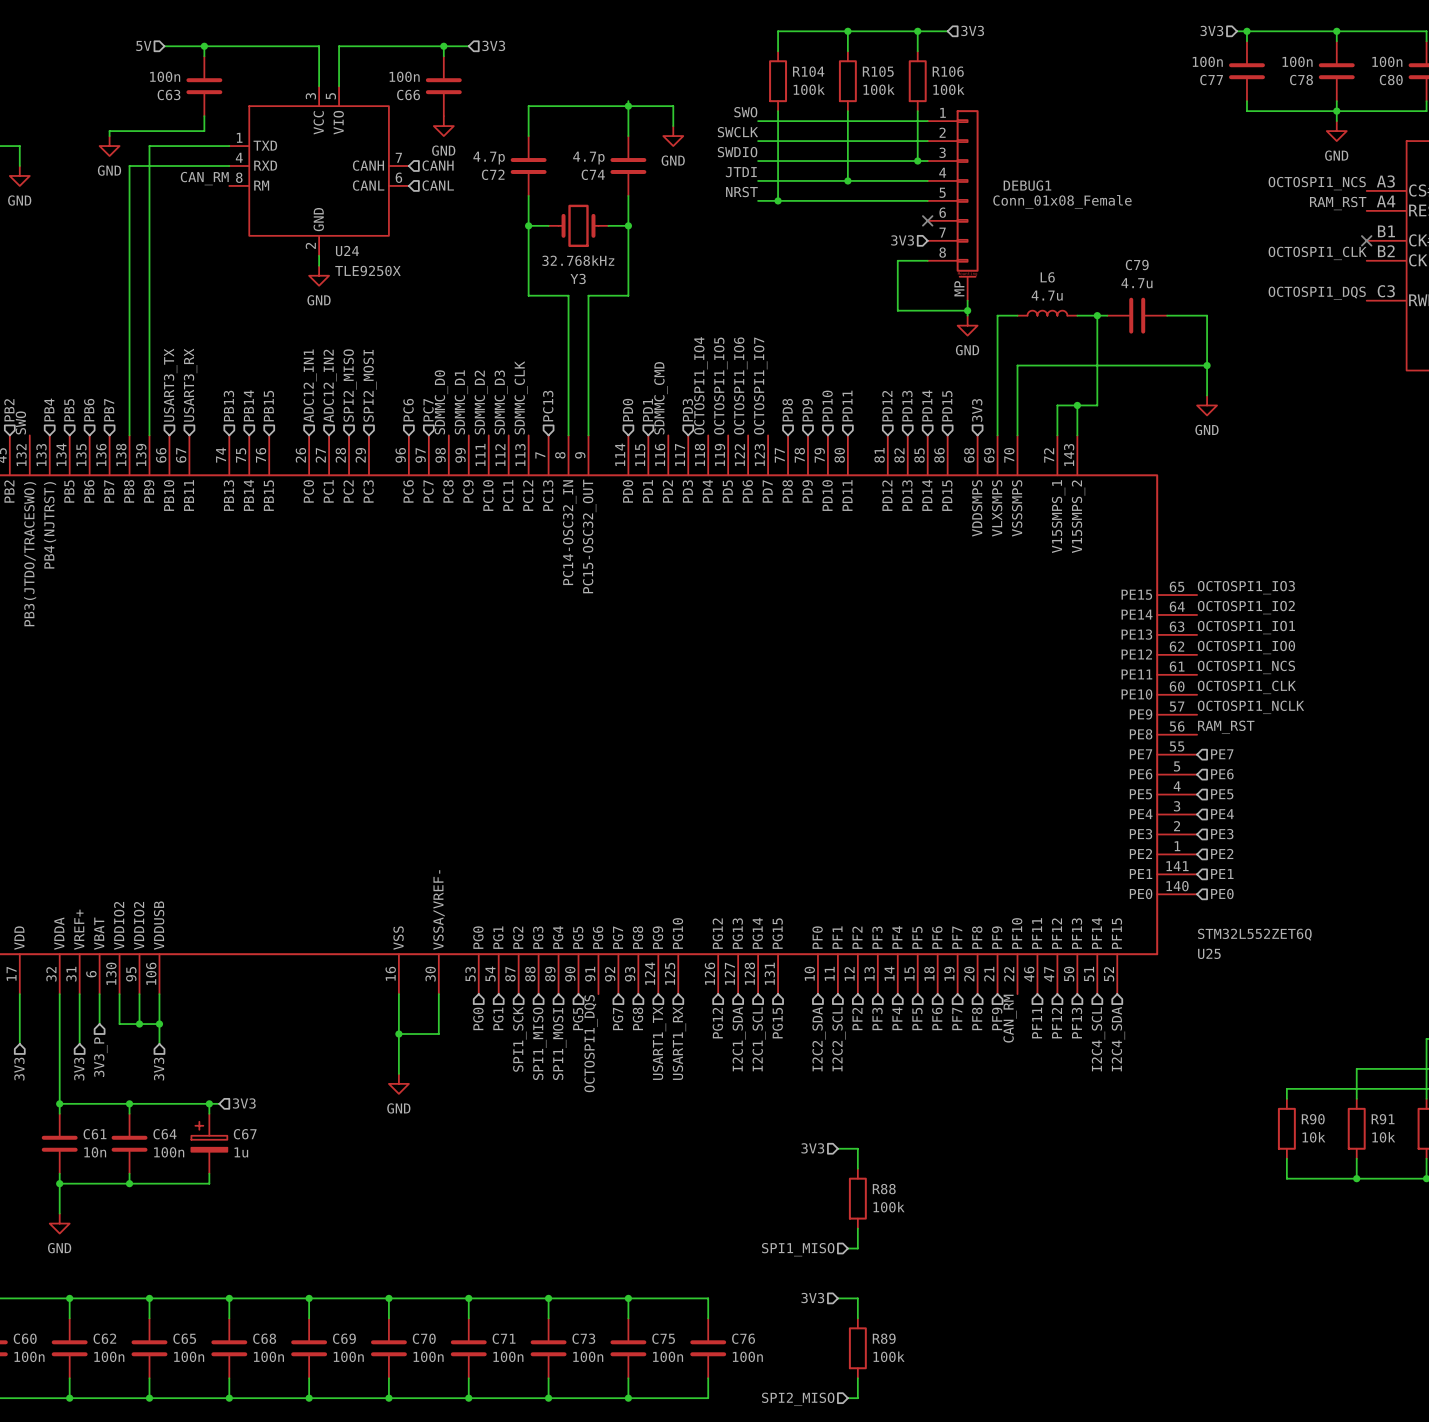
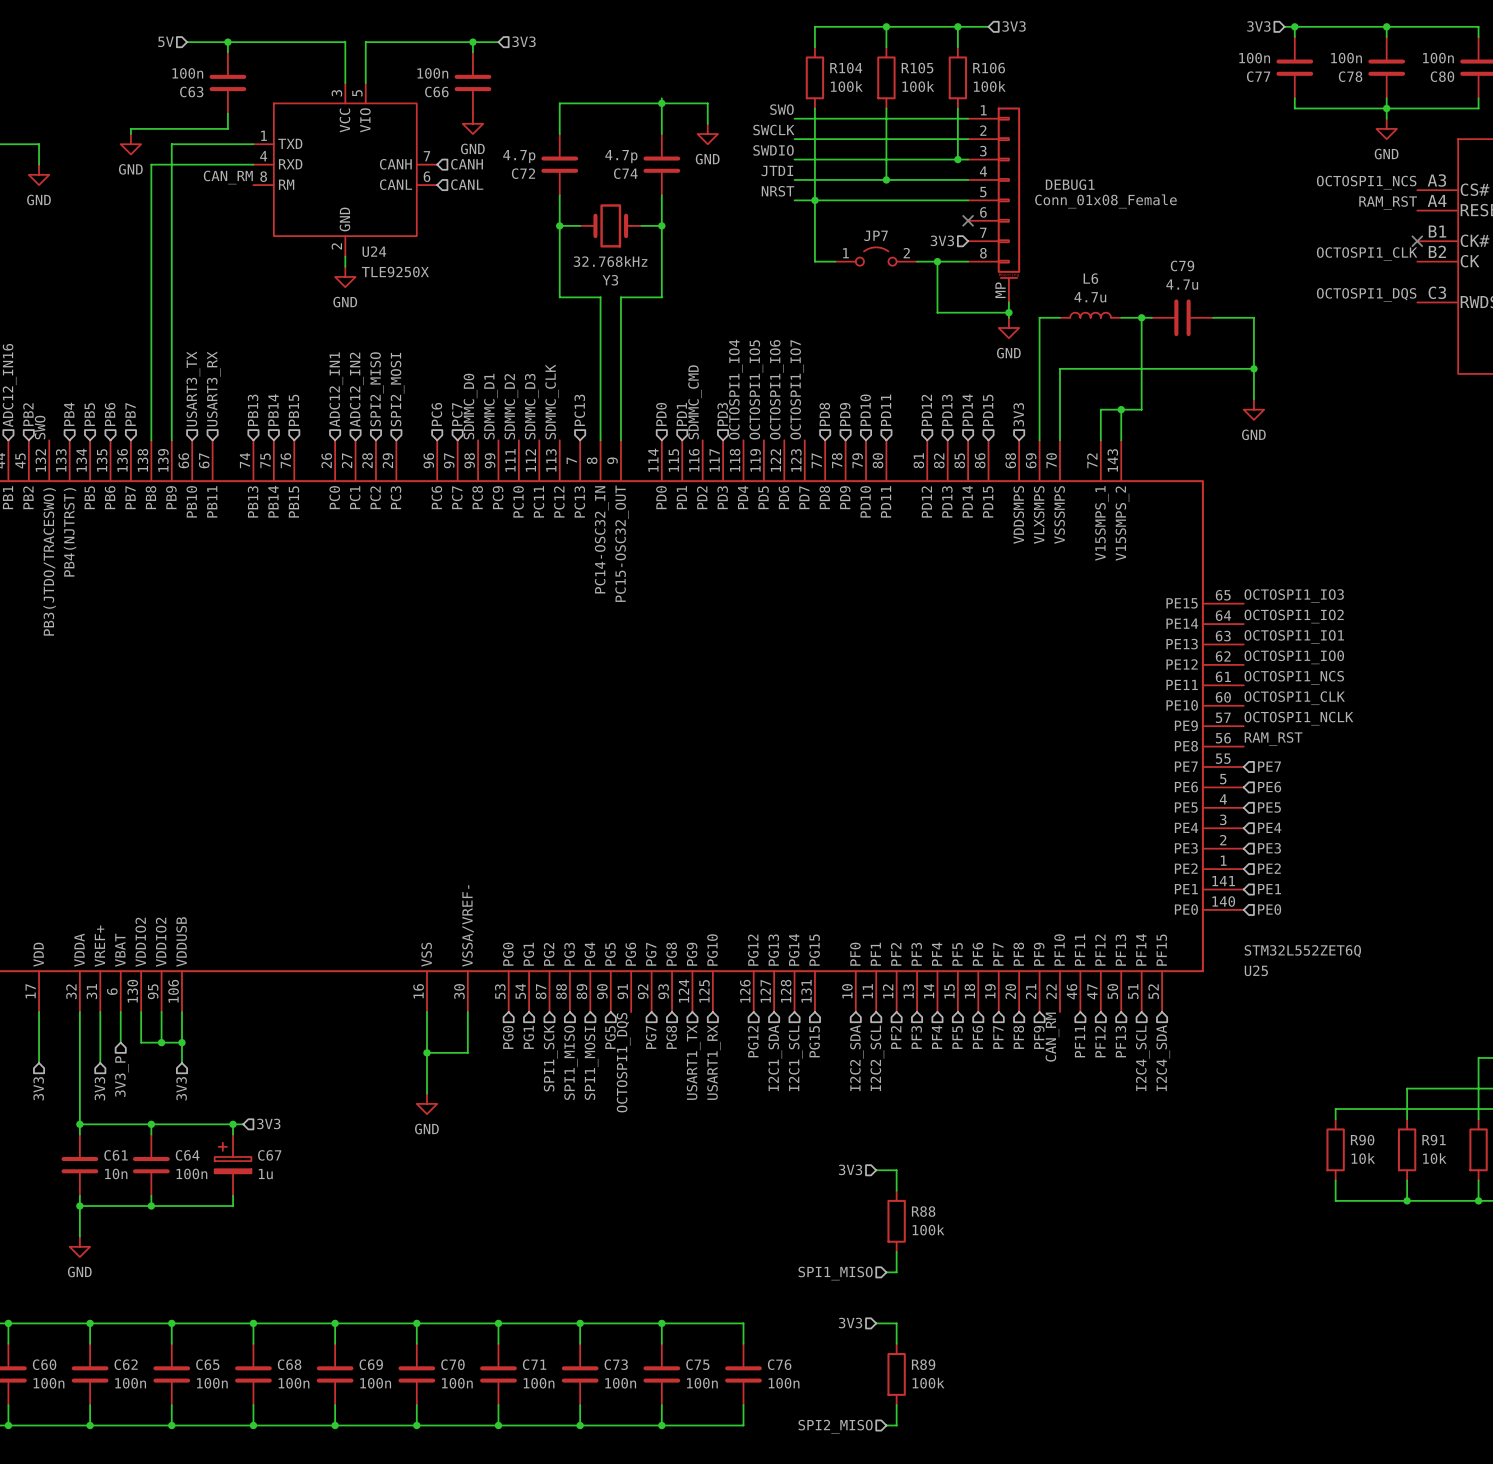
wire: none -> (814, 200) (814, 261) (835, 261)
JP7: none -> (876, 256)
wire: none -> (917, 261) (937, 261)
junction: none -> (937, 261)

